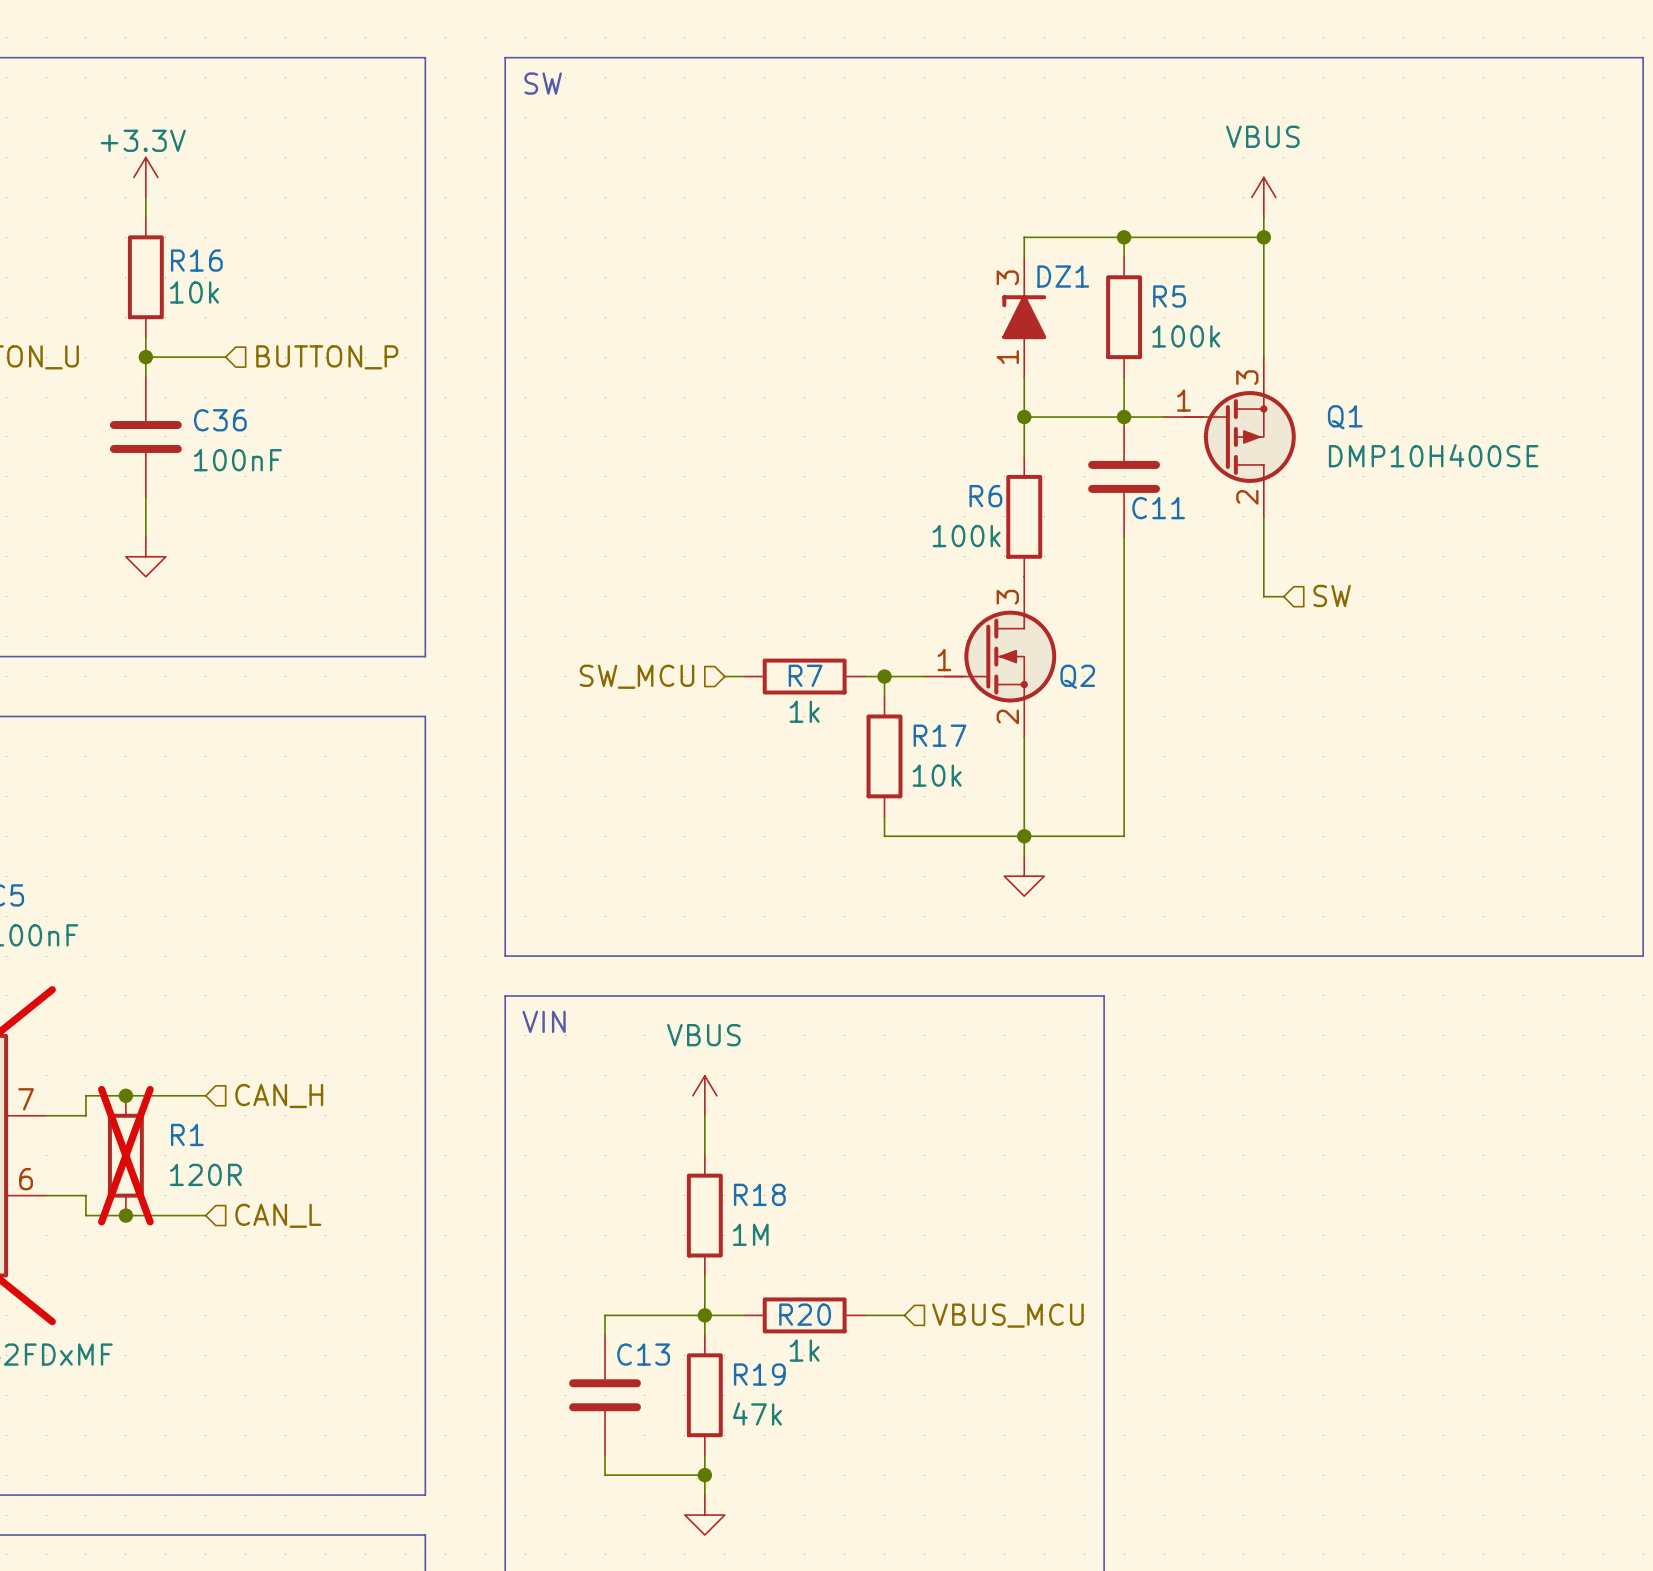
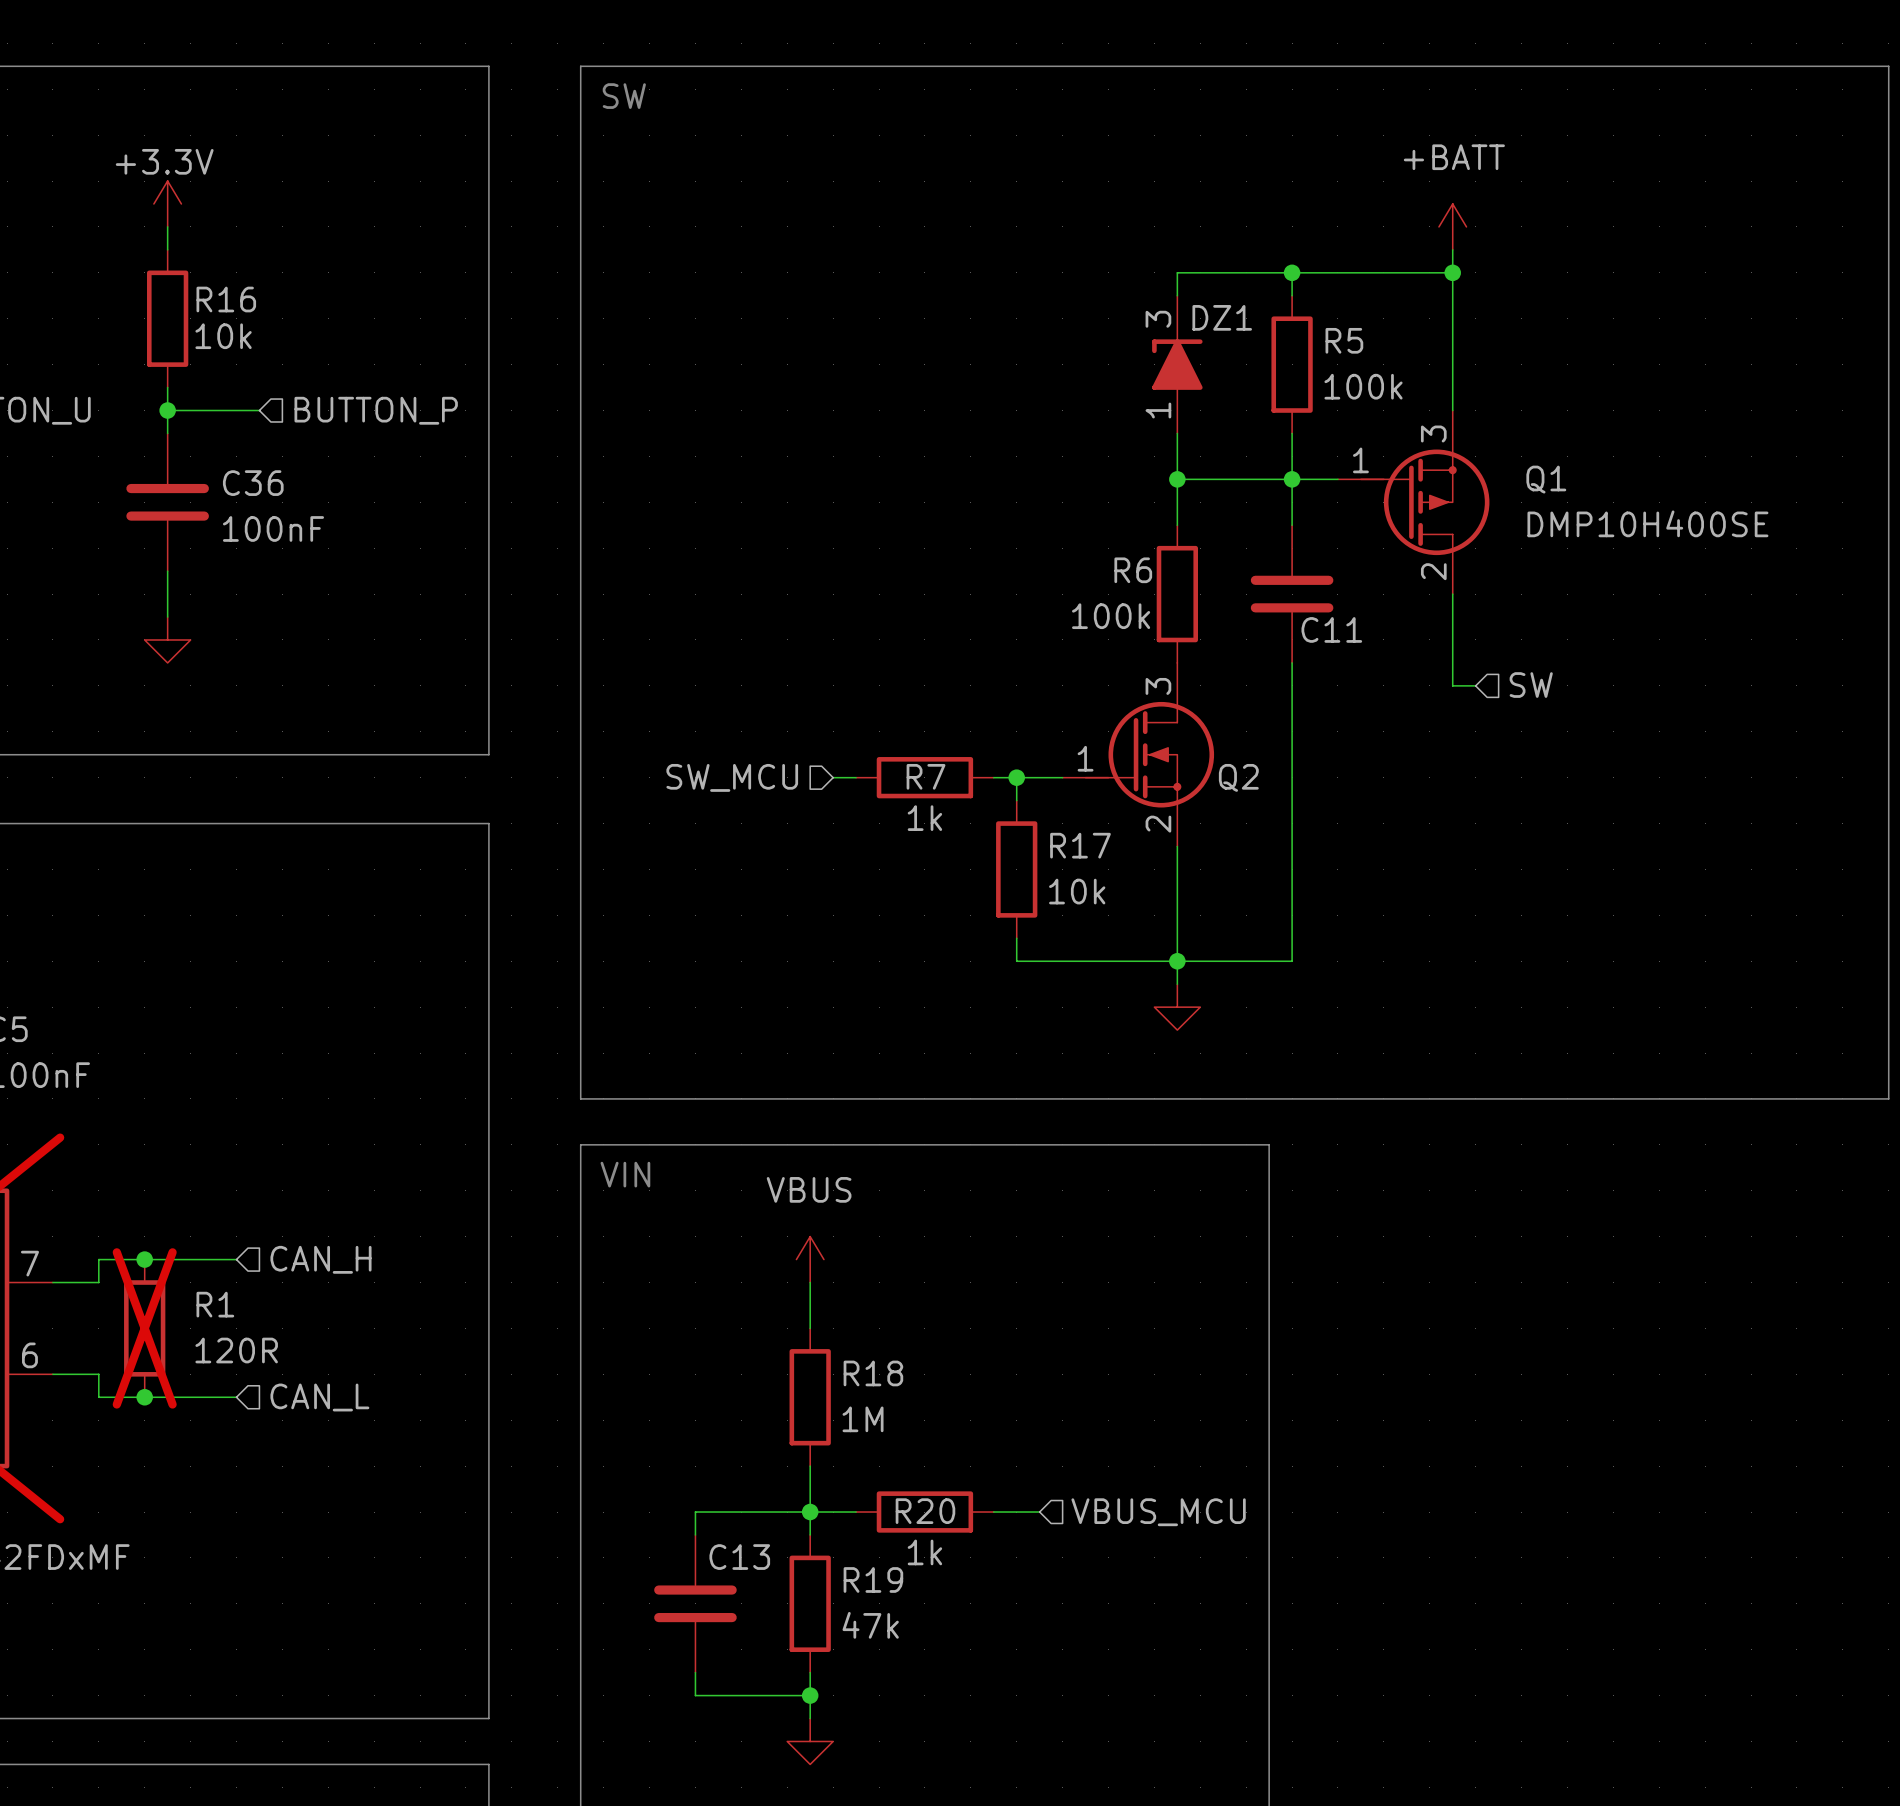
power symbol: VBUS (1263, 197) -> +BATT (1452, 226)
C11 position: (1124, 476) -> (1292, 594)

